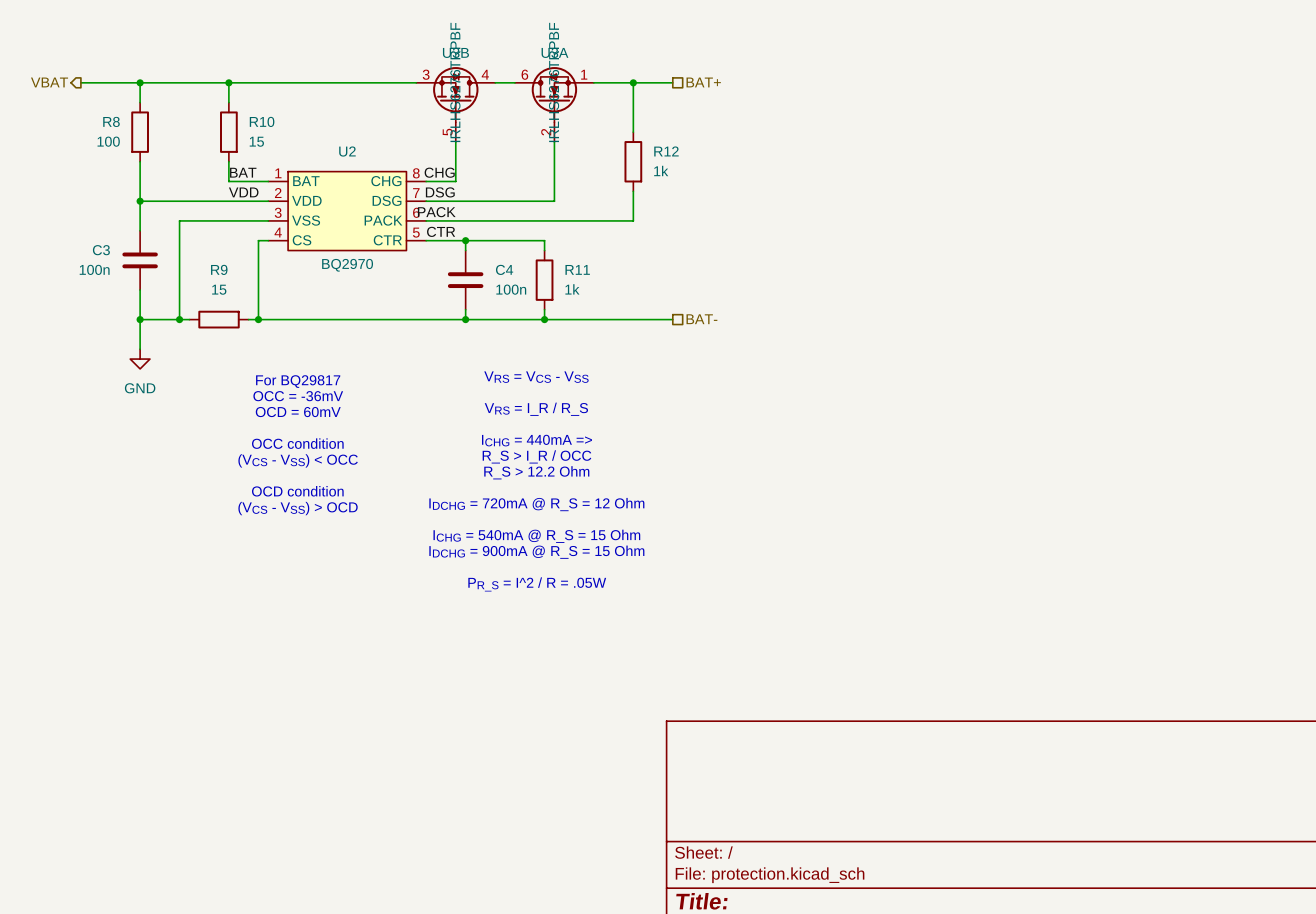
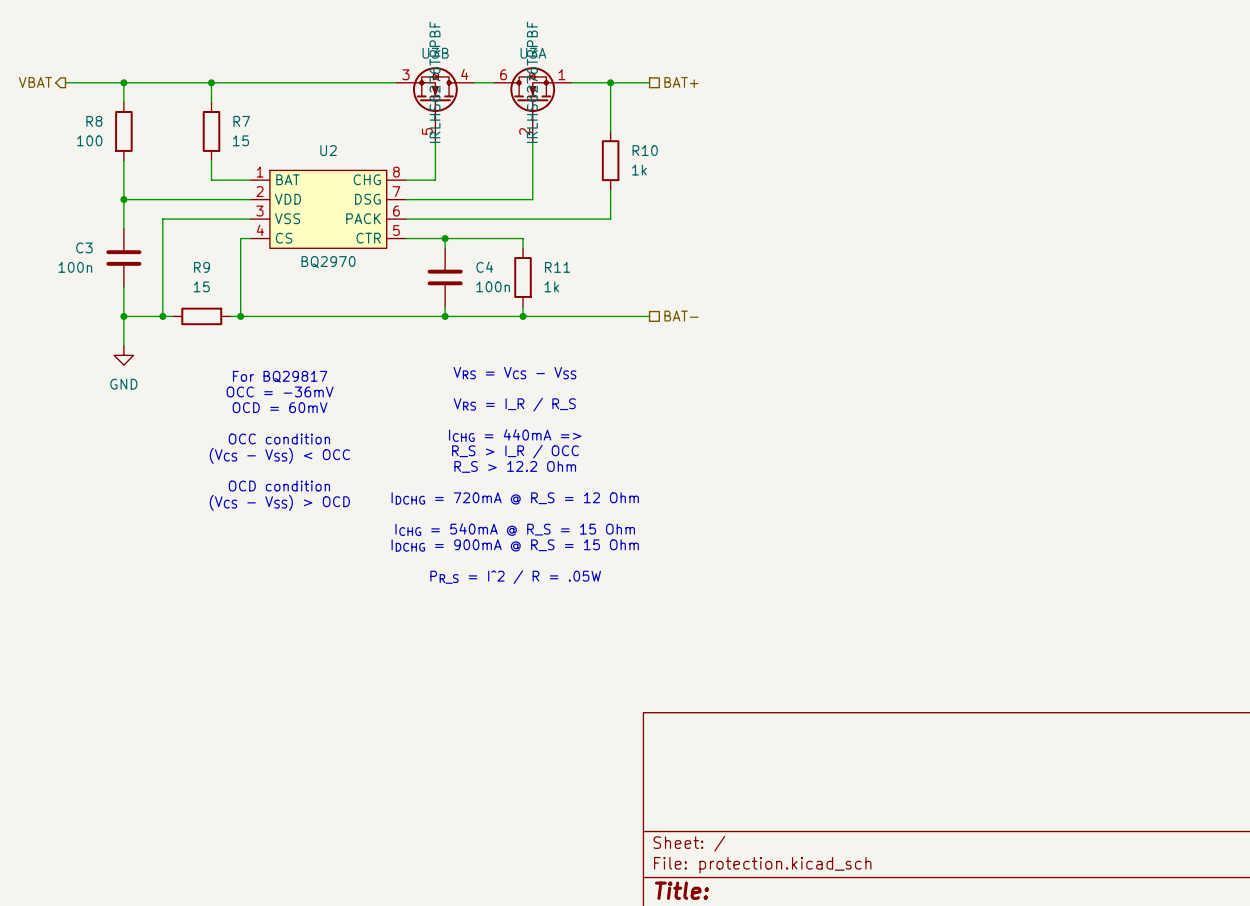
R10 name: R10 (262, 121) -> R7 (241, 121)
R12 name: R12 (666, 151) -> R10 (645, 150)
label: BAT (243, 172) -> none
label: CHG (439, 172) -> none
label: VDD (243, 192) -> none
label: DSG (440, 192) -> none
label: PACK (436, 212) -> none
label: CTR (441, 231) -> none

